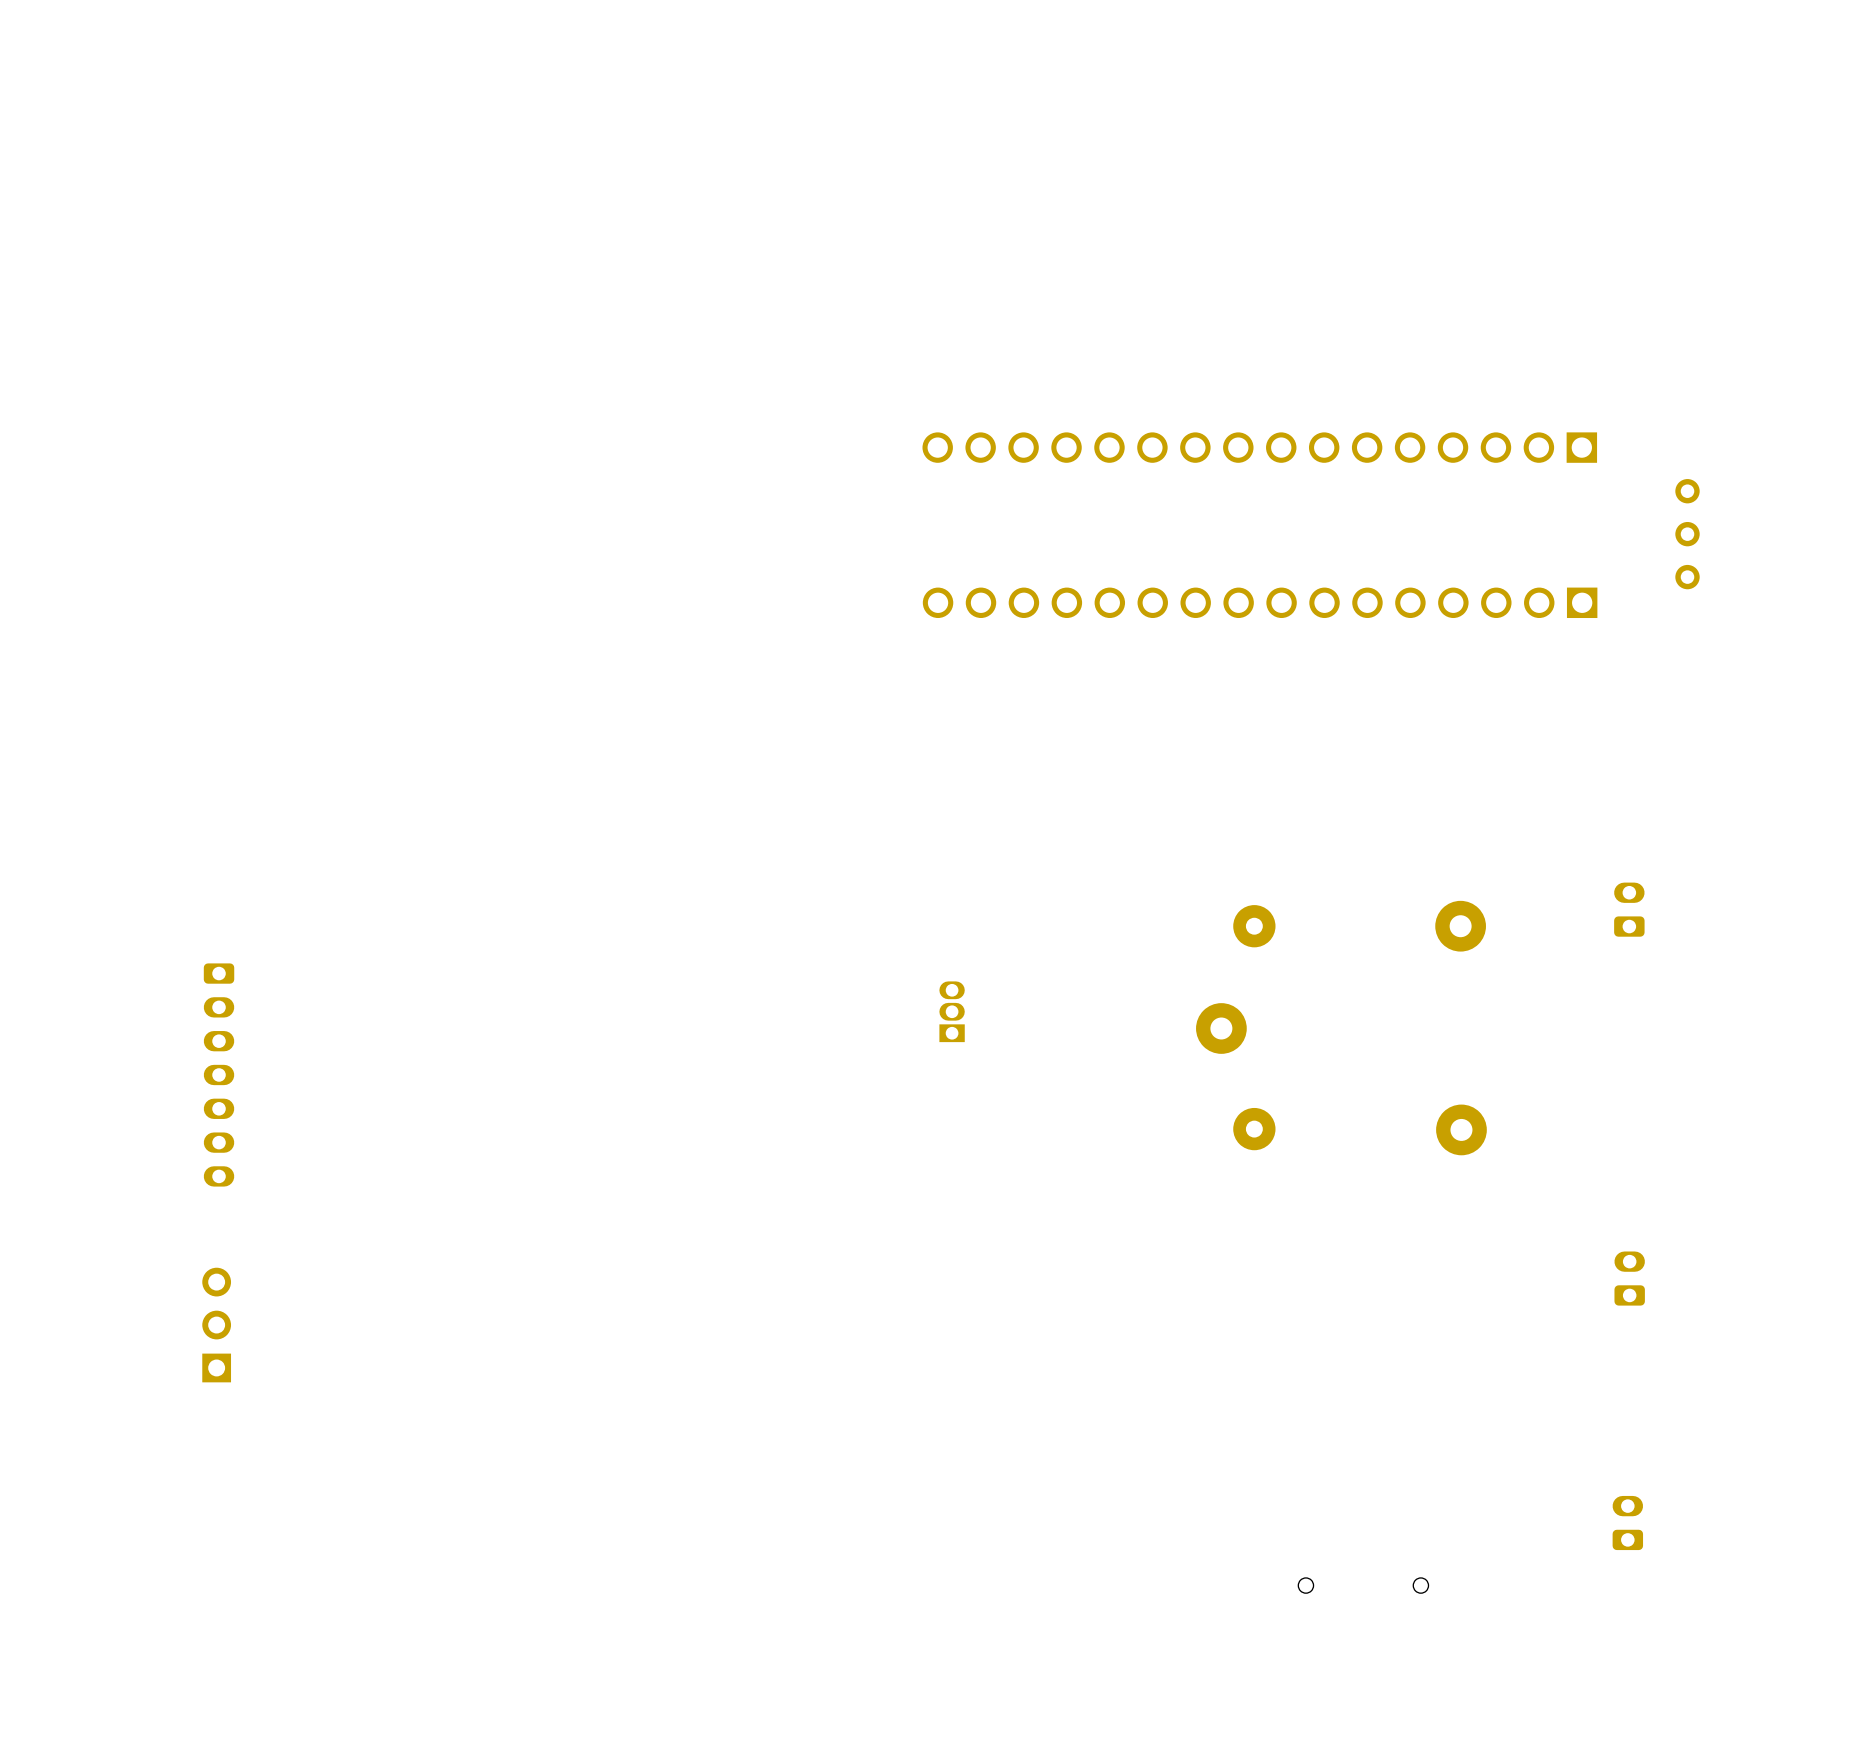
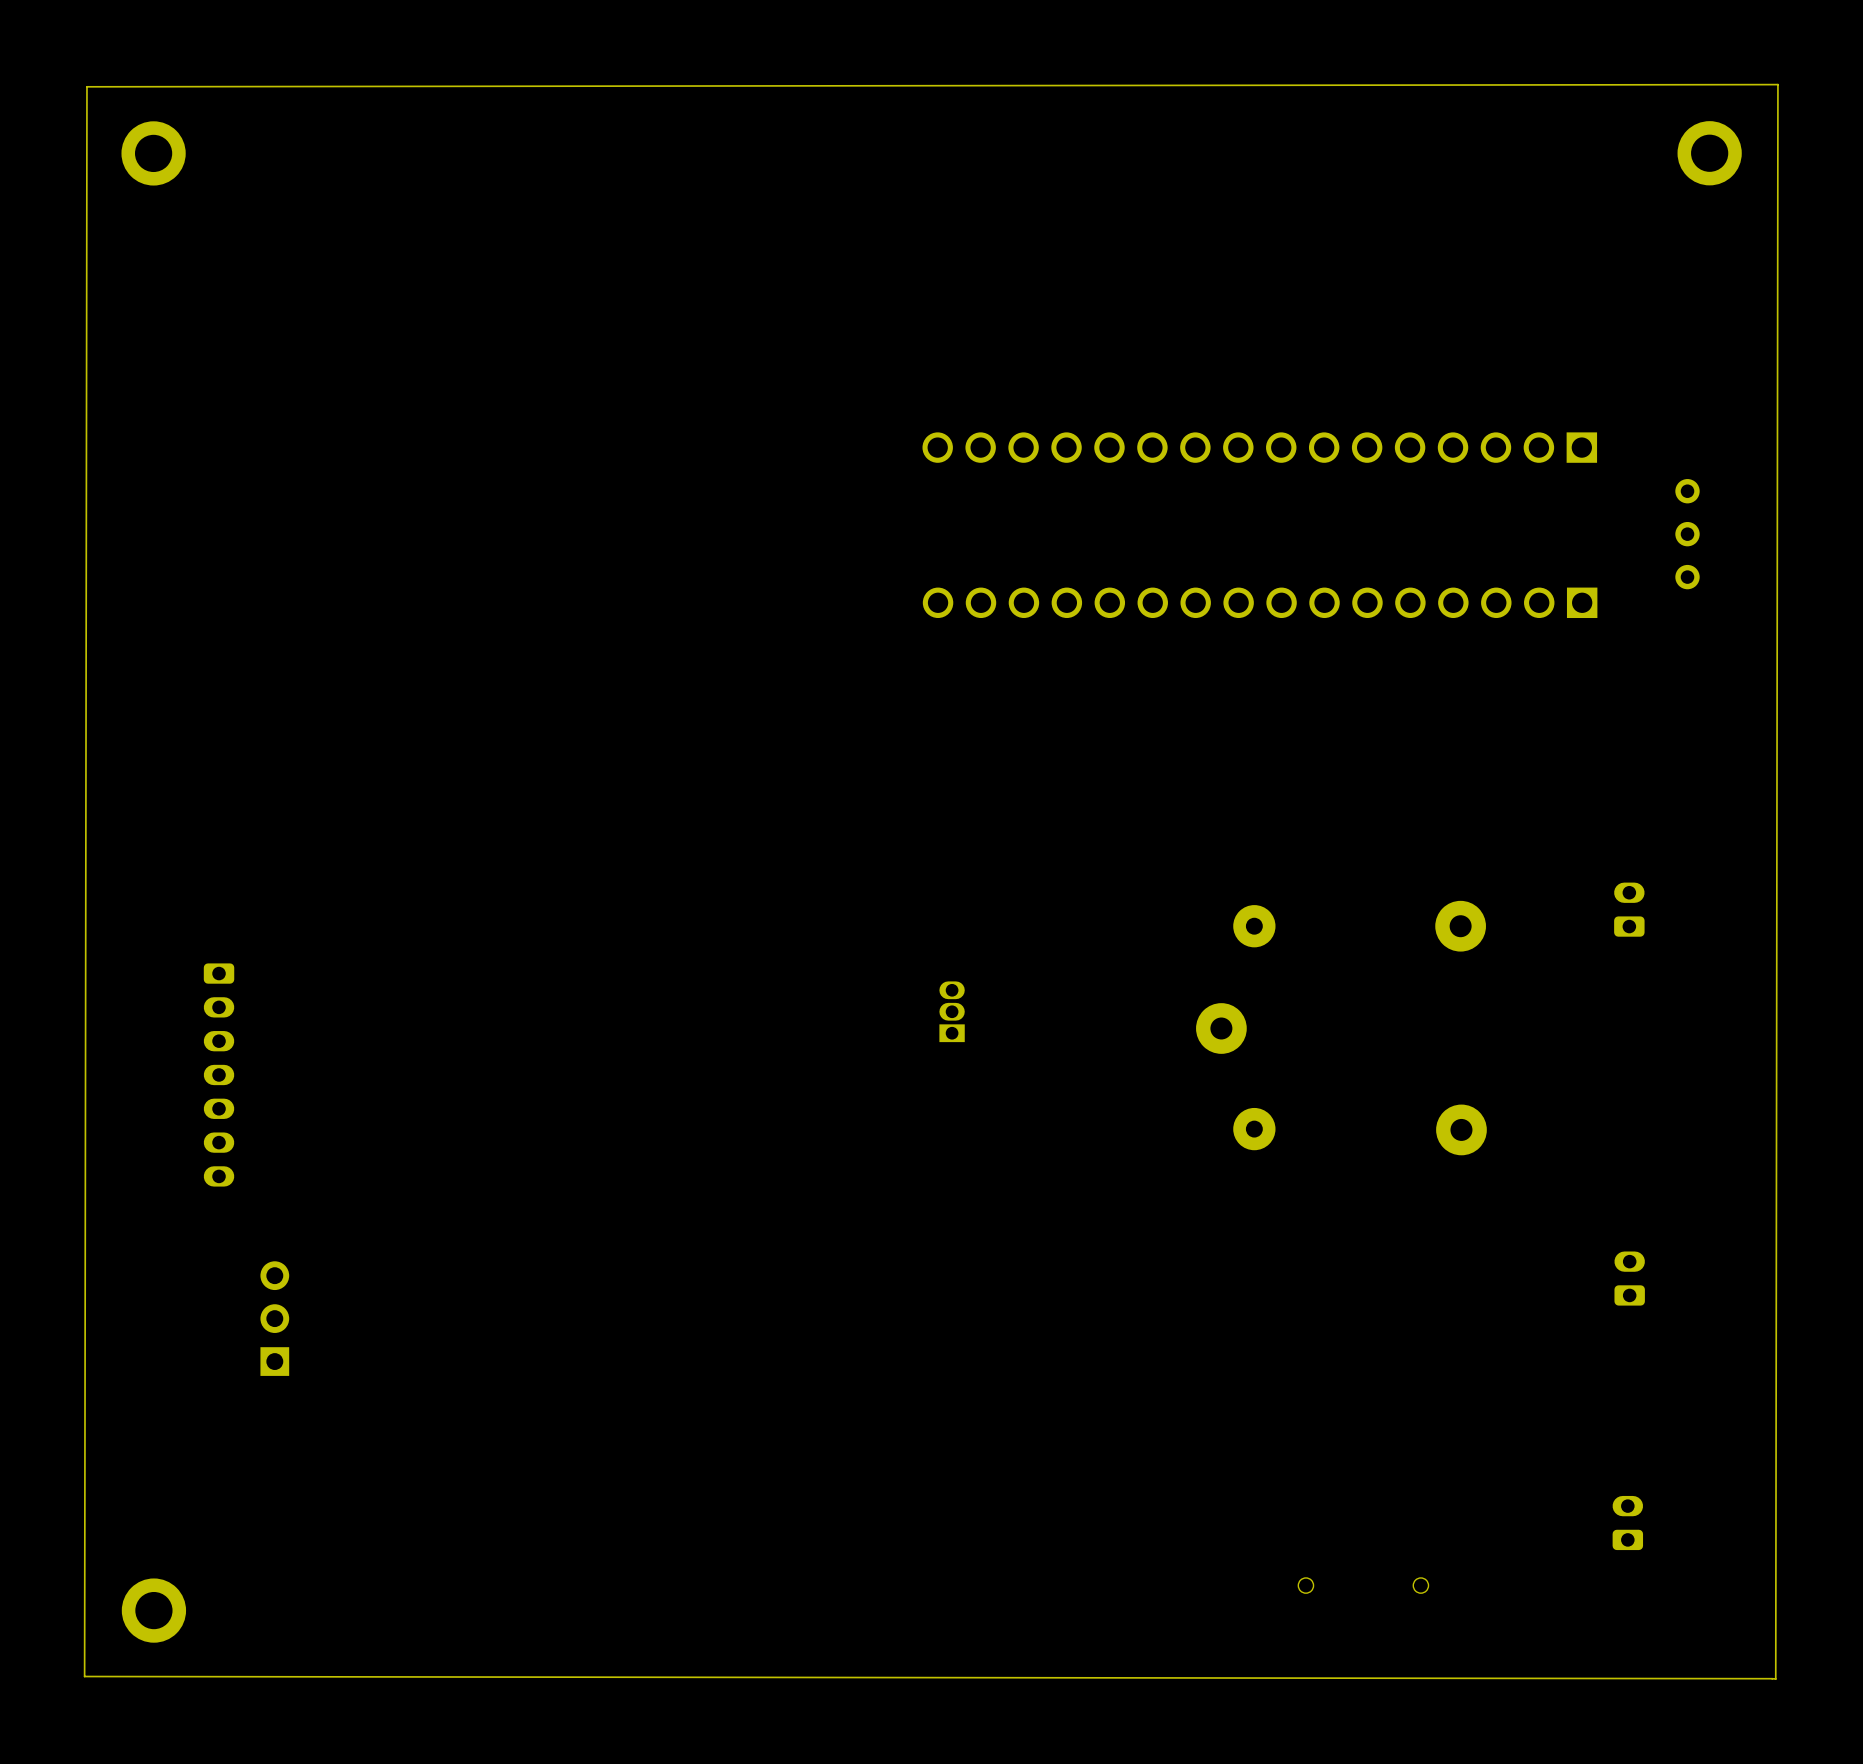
part: none -> (153, 153)
part: none -> (1709, 153)
part position: (216, 1325) -> (274, 1318)
part: none -> (153, 1610)
board edge: none -> (1772, 1678) (1775, 1679) (1777, 84) (86, 86) (84, 1676) (1772, 1678)

